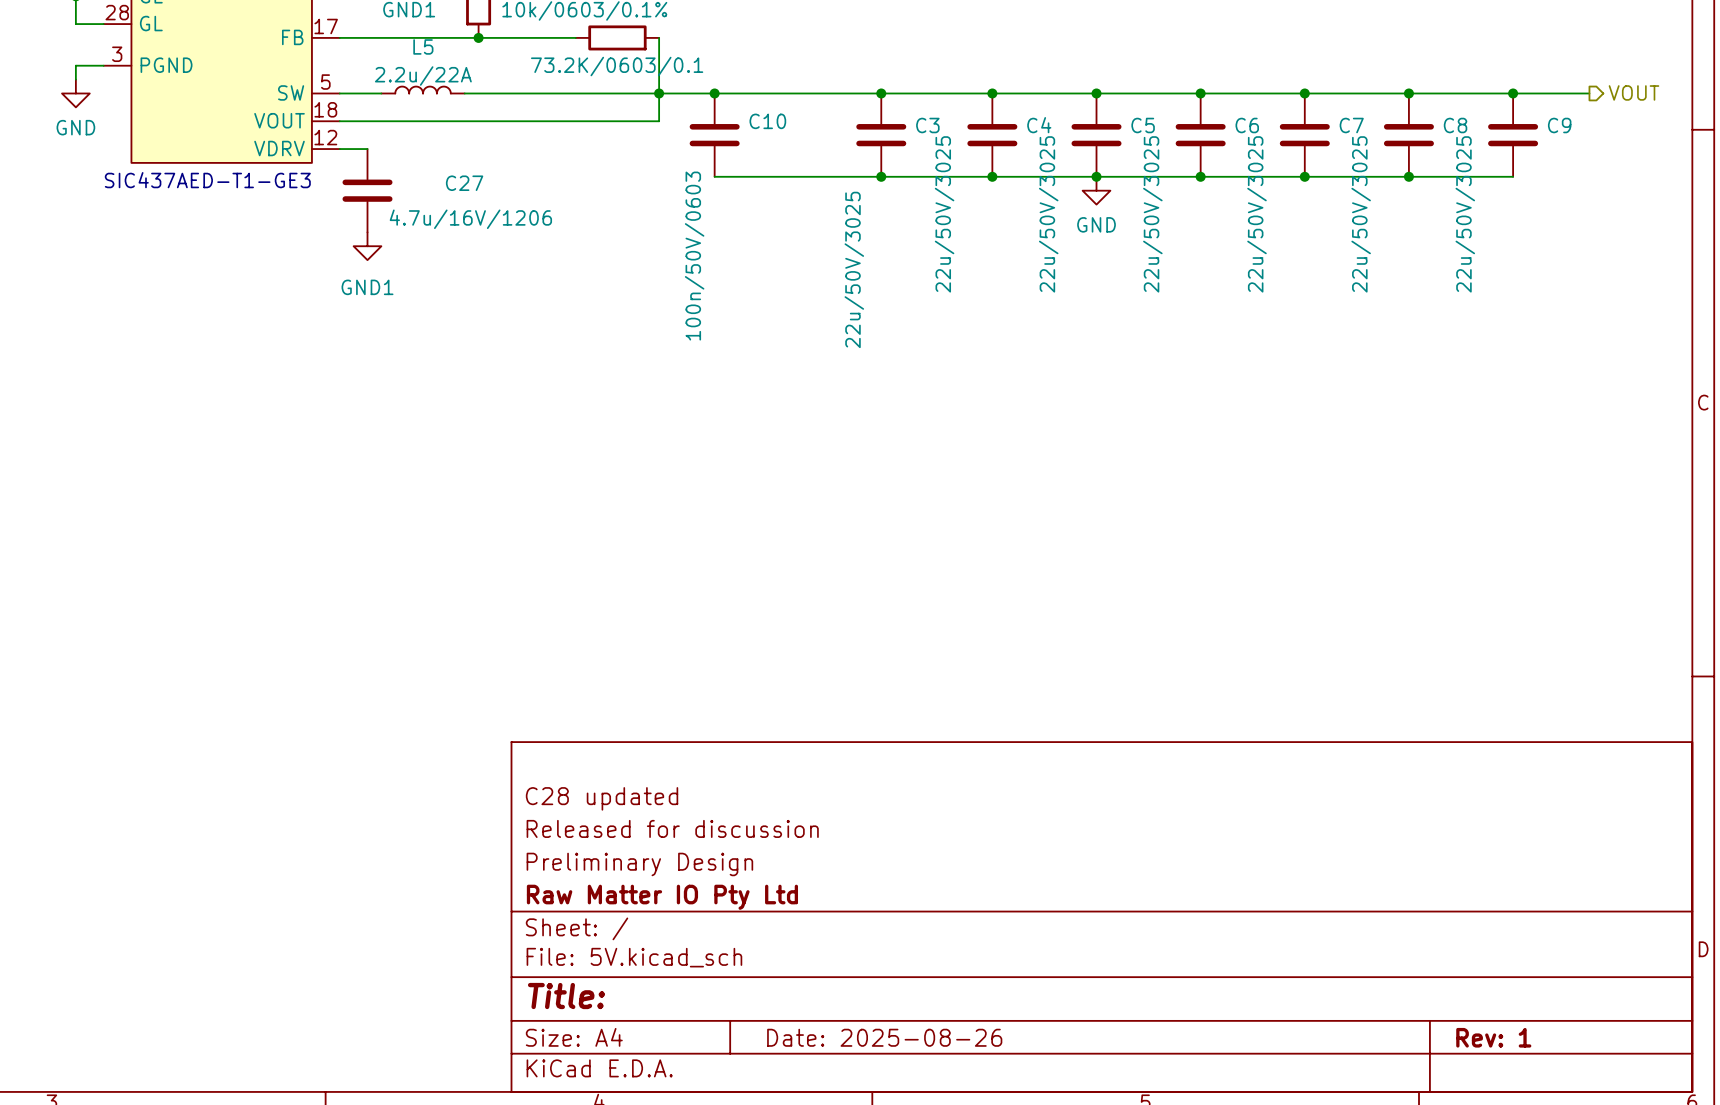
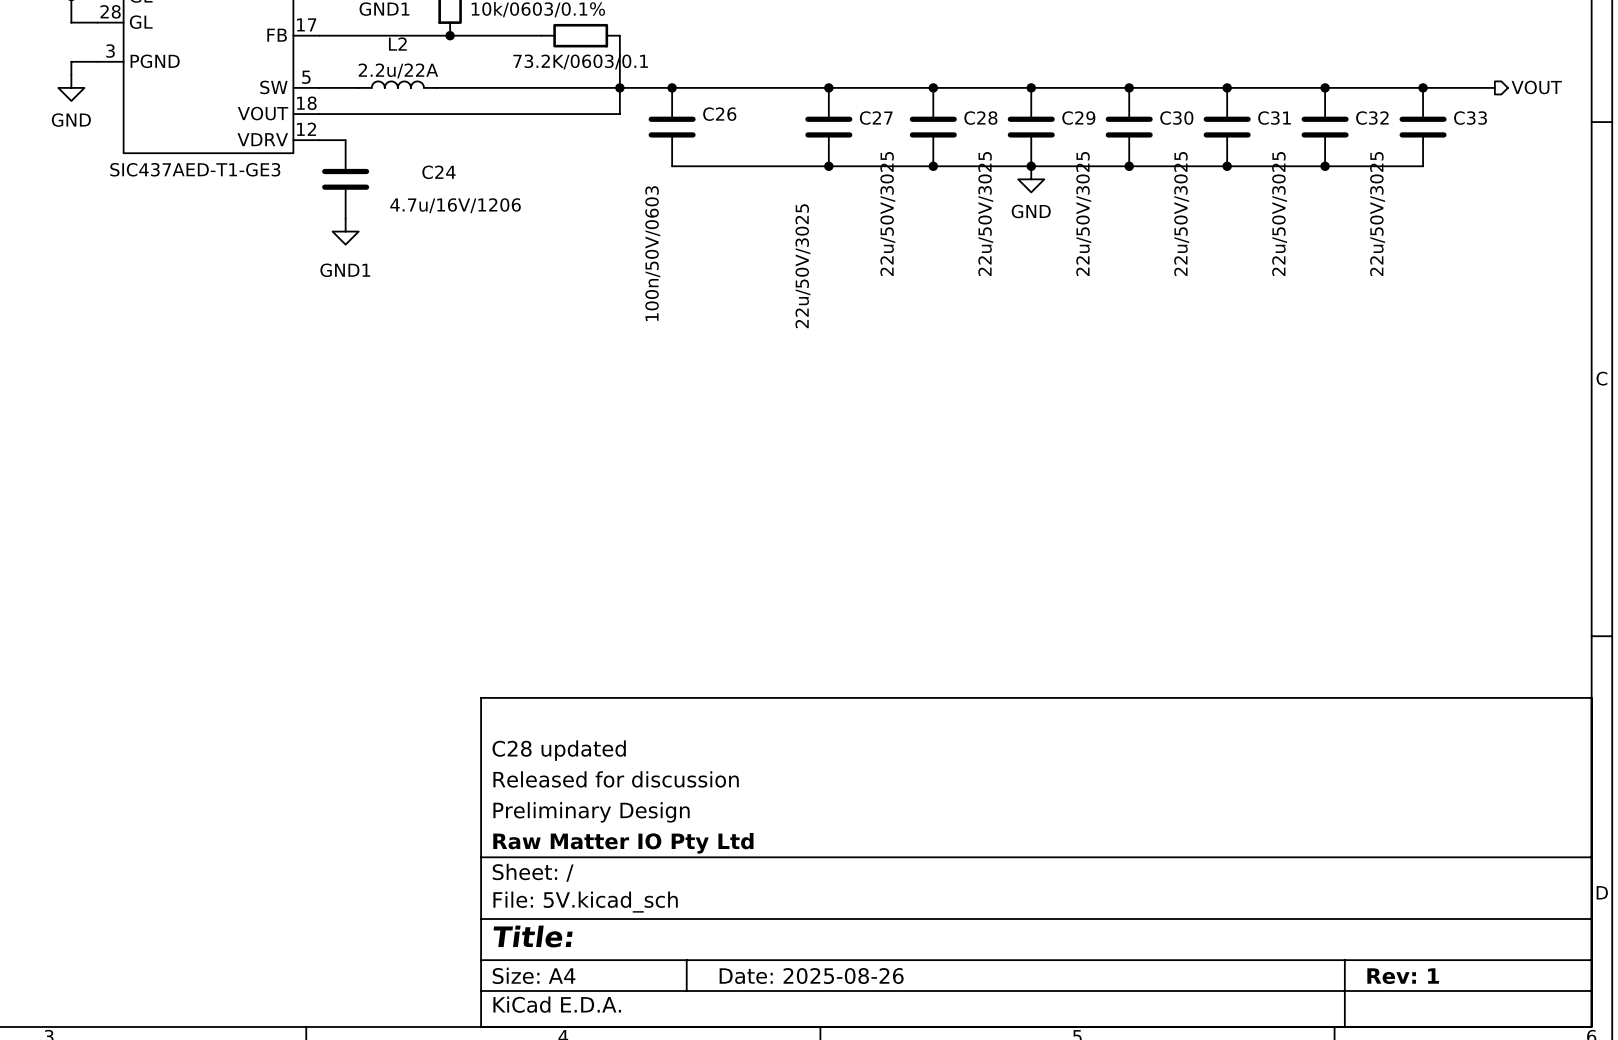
L5 name: L5 (423, 46) -> L2 (397, 44)
C10 name: C10 (767, 121) -> C26 (719, 114)
C3 name: C3 (927, 125) -> C27 (876, 118)
C4 name: C4 (1039, 125) -> C28 (980, 118)
C5 name: C5 (1143, 125) -> C29 (1078, 118)
C6 name: C6 (1247, 125) -> C30 (1176, 118)
C7 name: C7 (1351, 125) -> C31 (1274, 118)
C8 name: C8 (1455, 125) -> C32 (1372, 118)
C9 name: C9 (1559, 125) -> C33 (1470, 118)
C27 name: C27 (464, 183) -> C24 (438, 172)

